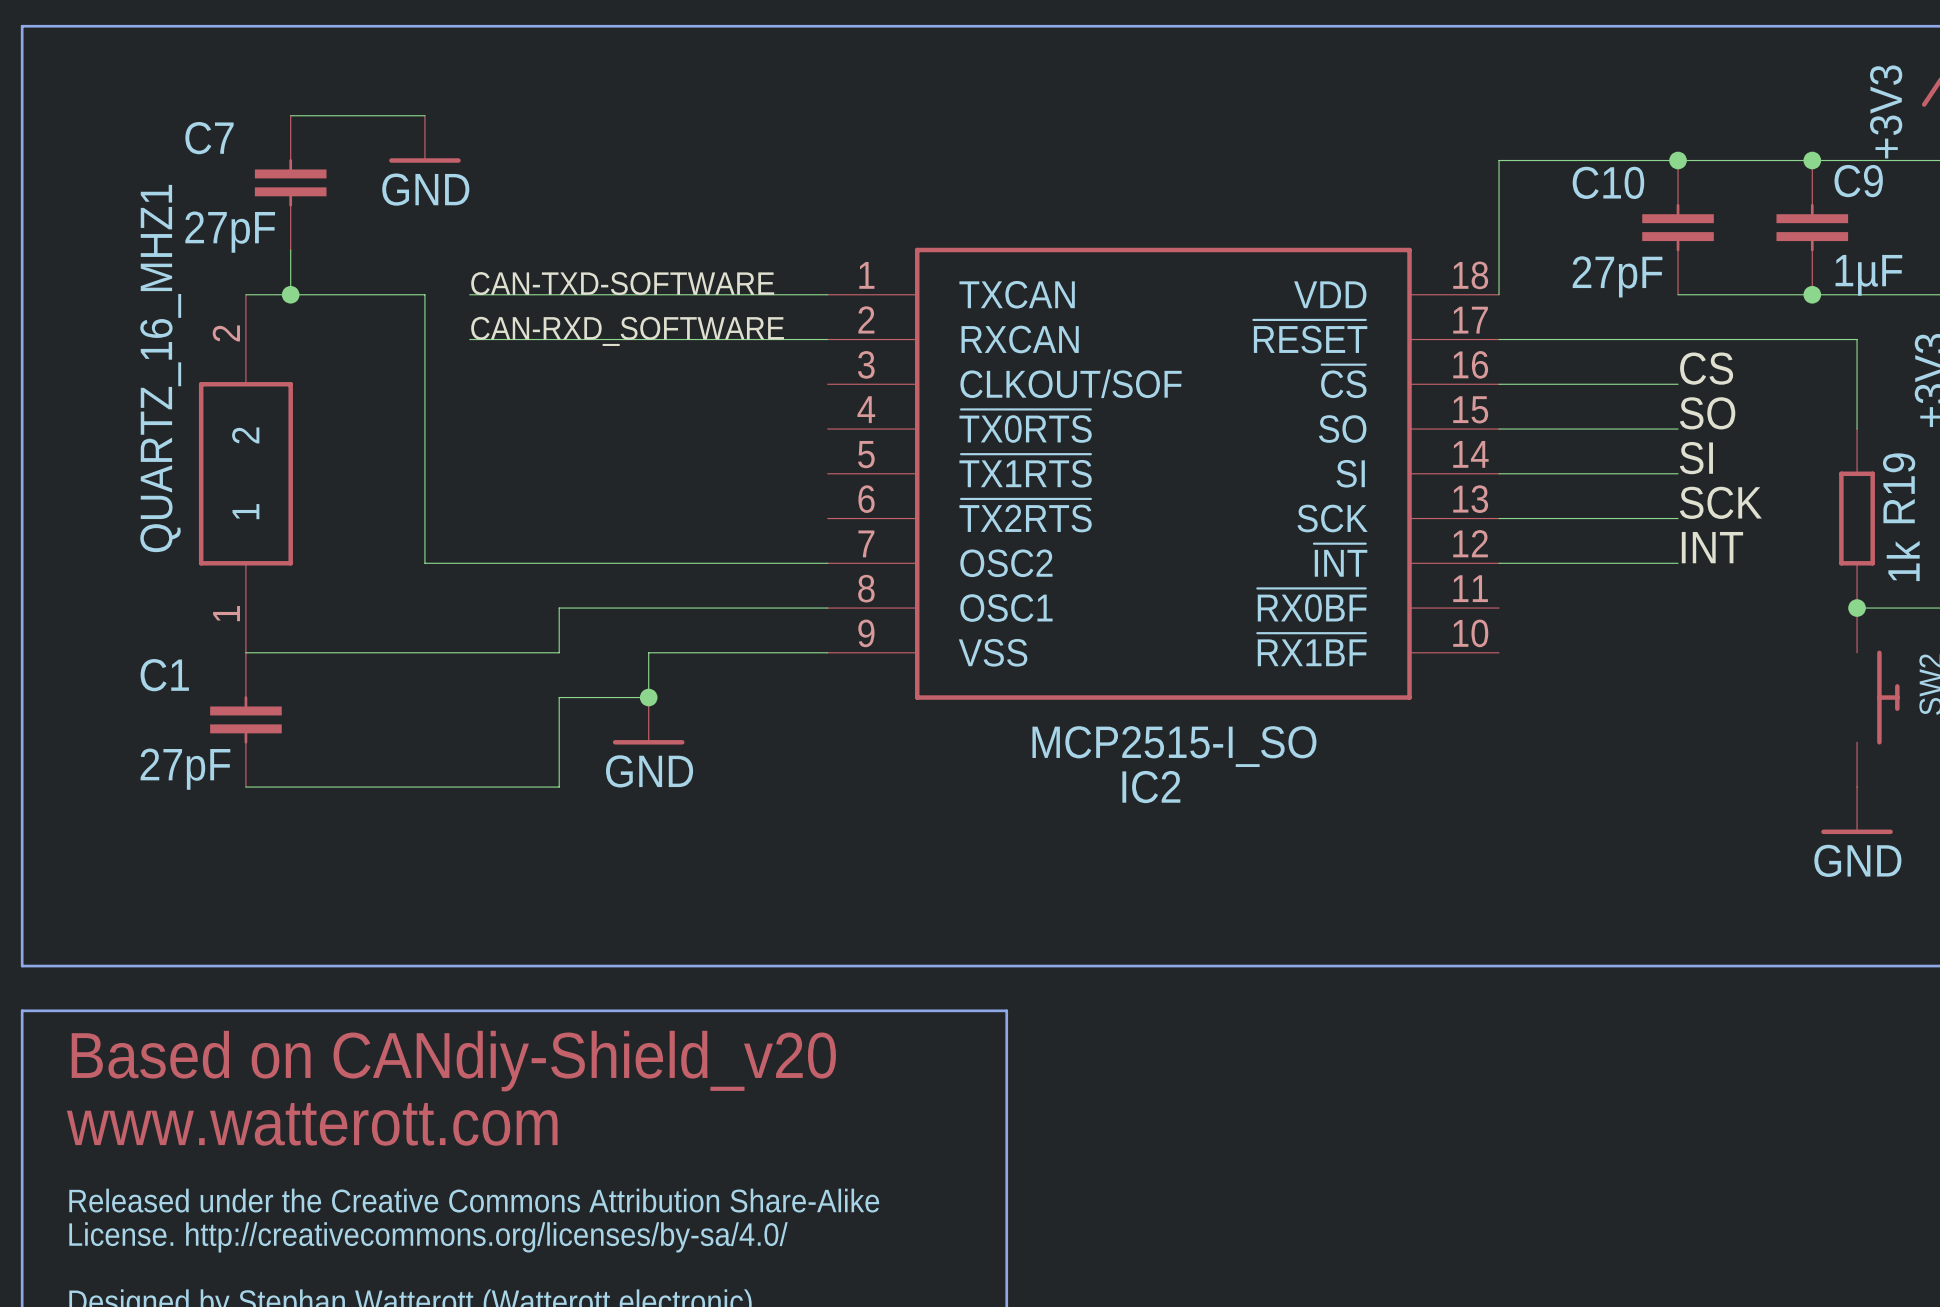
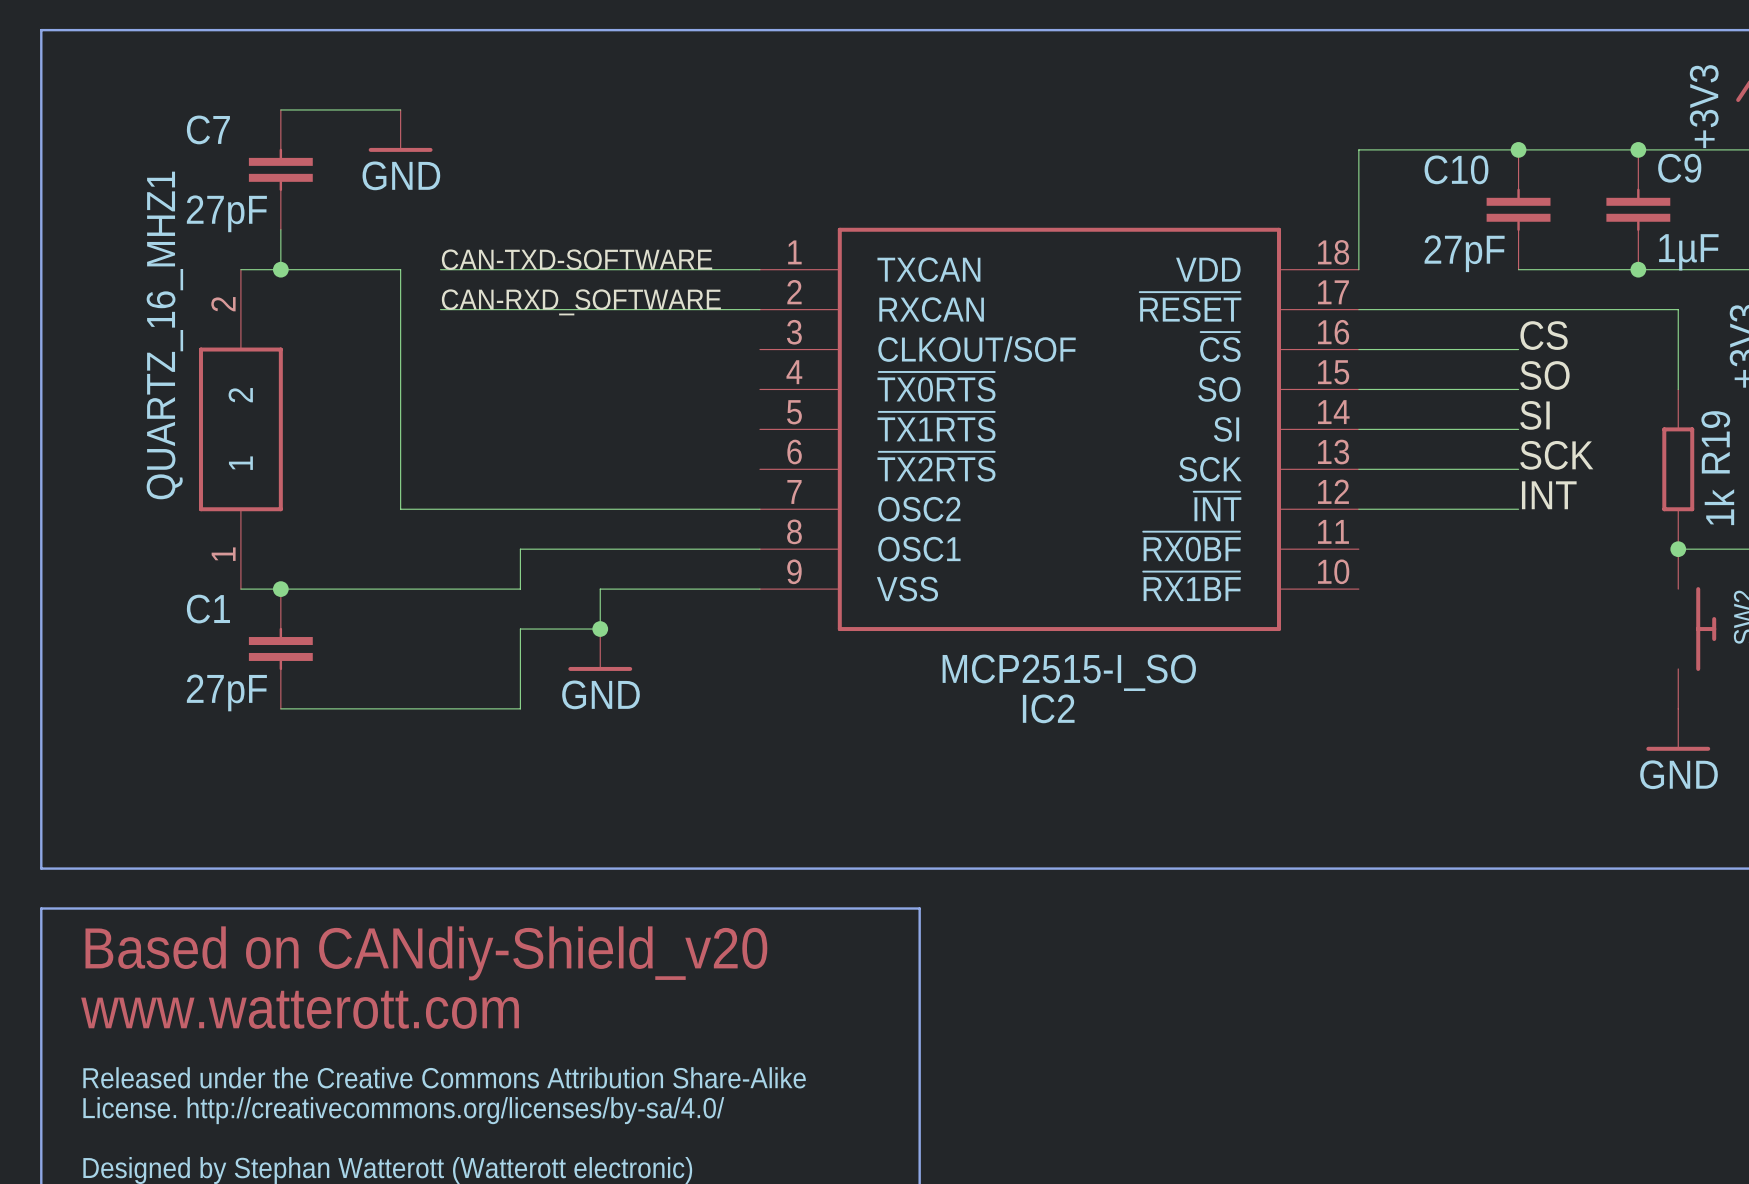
junction: none -> (280, 589)
C1 position: (245, 719) -> (280, 648)
wire: (245, 787) (290, 787) -> none

